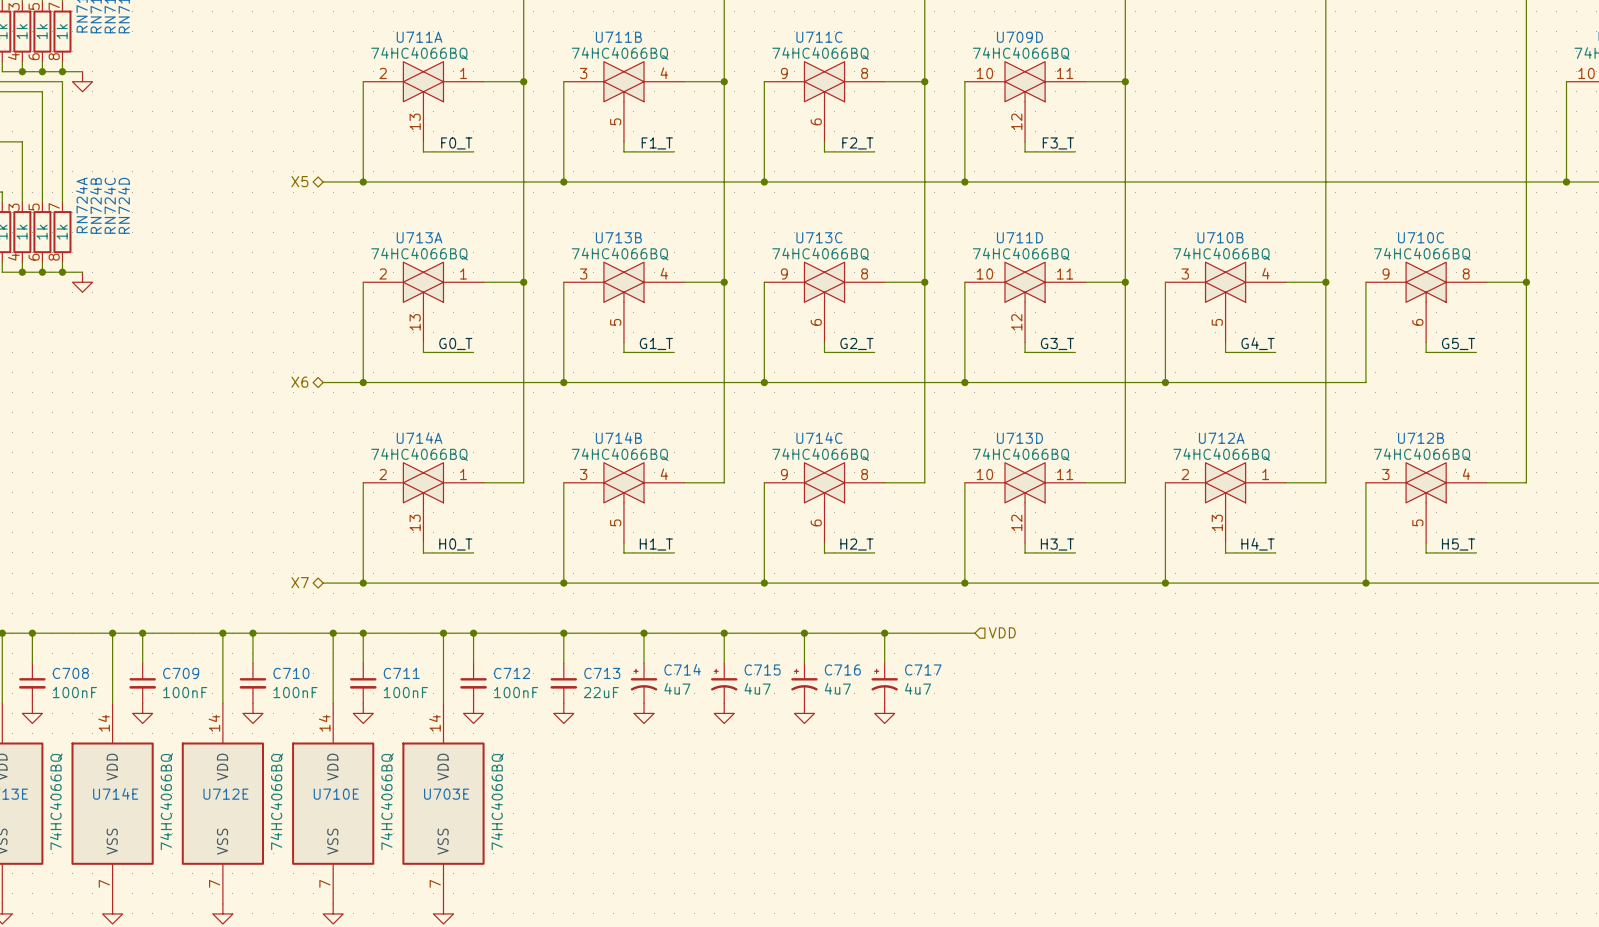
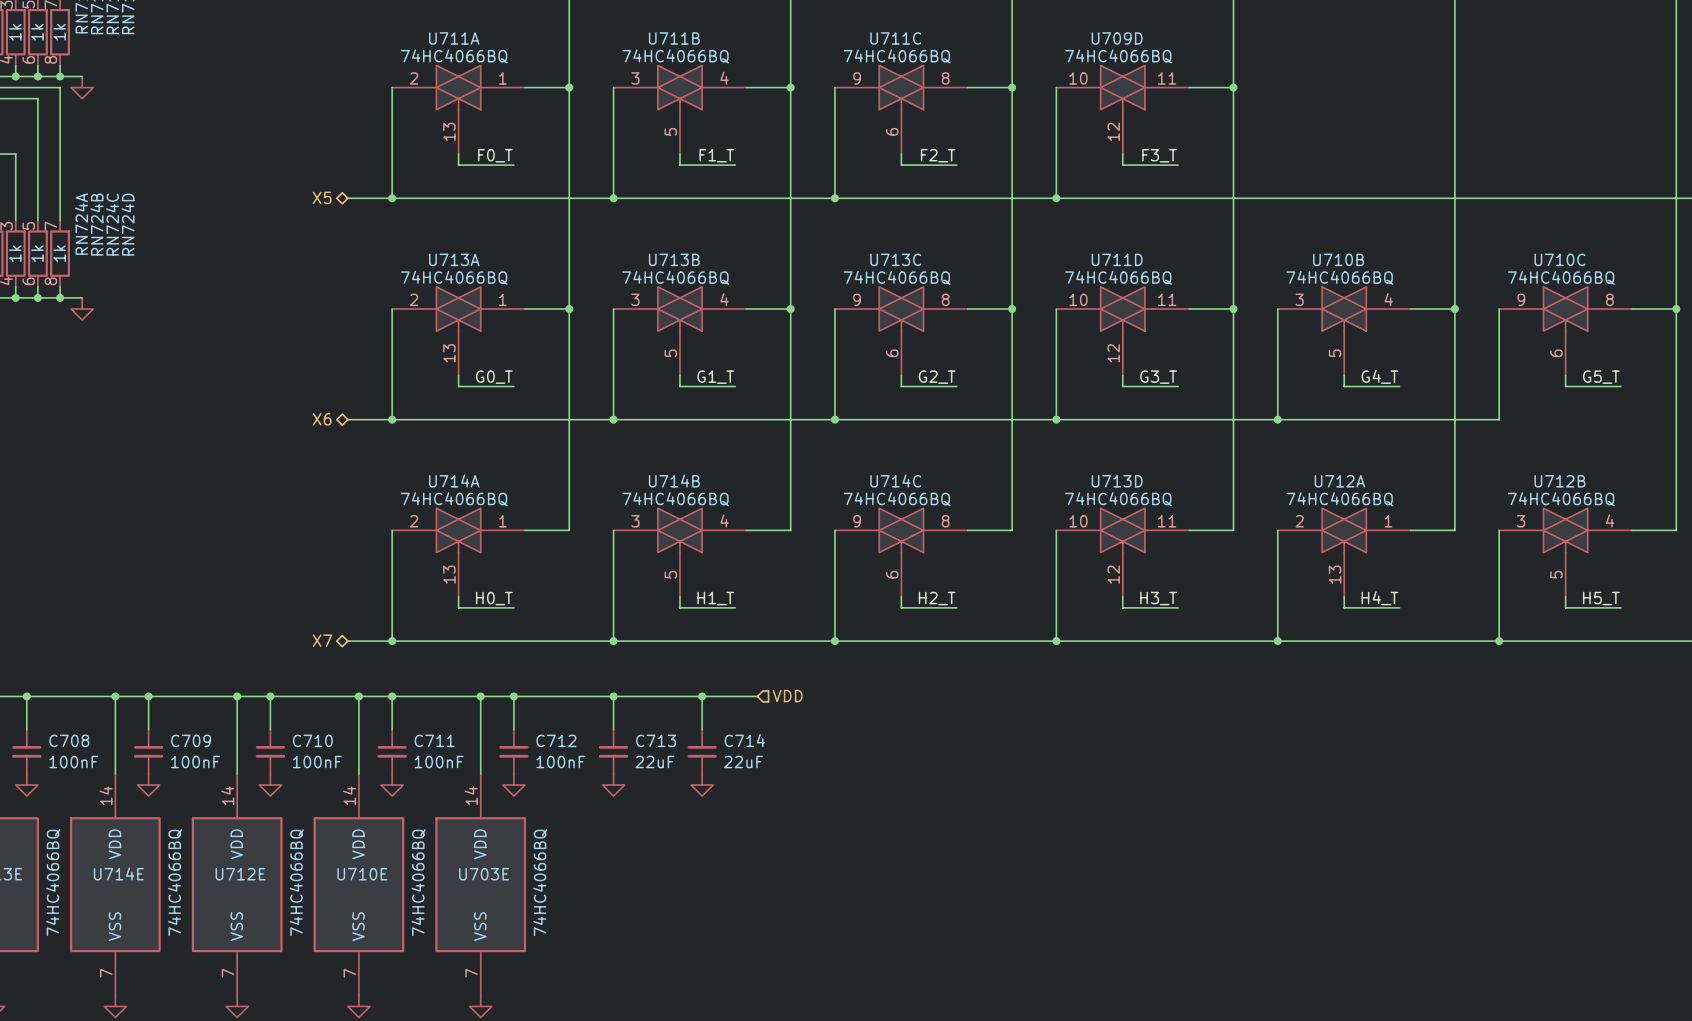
hierarchical label: none -> VDD (787, 696)
hierarchical label: VDD (1002, 632) -> none
wire: (694, 633) (974, 633) -> none
wire: (724, 633) (724, 663) -> none
junction: (724, 633) -> none
wire: (804, 633) (804, 663) -> none
junction: (804, 633) -> none
wire: (884, 633) (884, 663) -> none
junction: (884, 633) -> none
C714 symbol: [630, 663, 658, 704] -> [687, 729, 717, 774]
C715: 4u7 (724, 683) -> none
C716: 4u7 (804, 683) -> none
C717: 4u7 (884, 683) -> none
C714 value: 4u7 (677, 688) -> 22uF (743, 762)
power symbol: (724, 713) -> none
power symbol: (804, 713) -> none
power symbol: (884, 713) -> none

